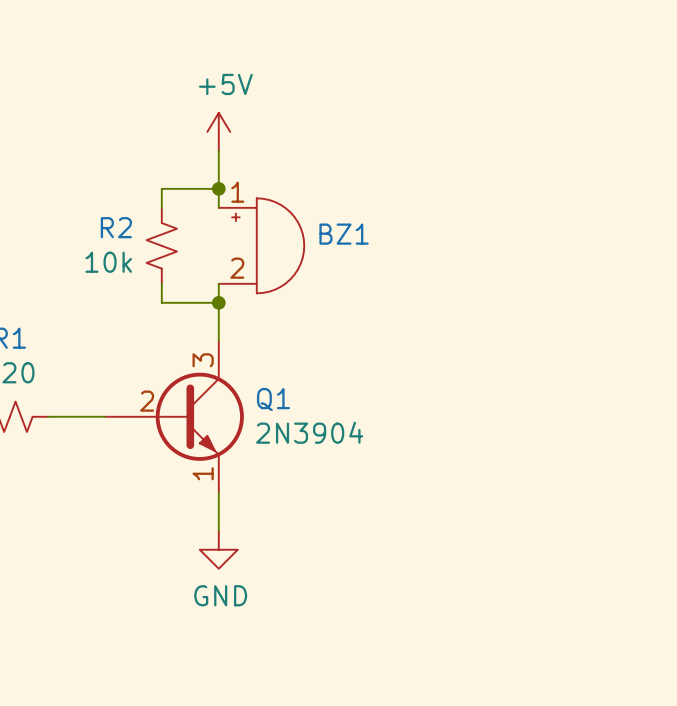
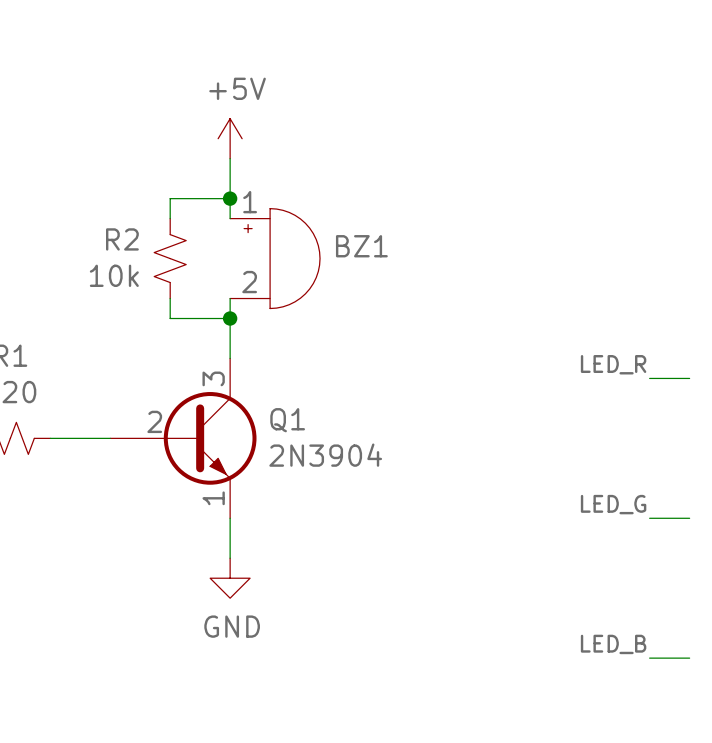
label: none -> LED_R (613, 364)
wire: none -> (649, 378) (689, 378)
label: none -> LED_G (613, 504)
wire: none -> (649, 518) (689, 518)
label: none -> LED_B (613, 644)
wire: none -> (649, 658) (689, 658)

